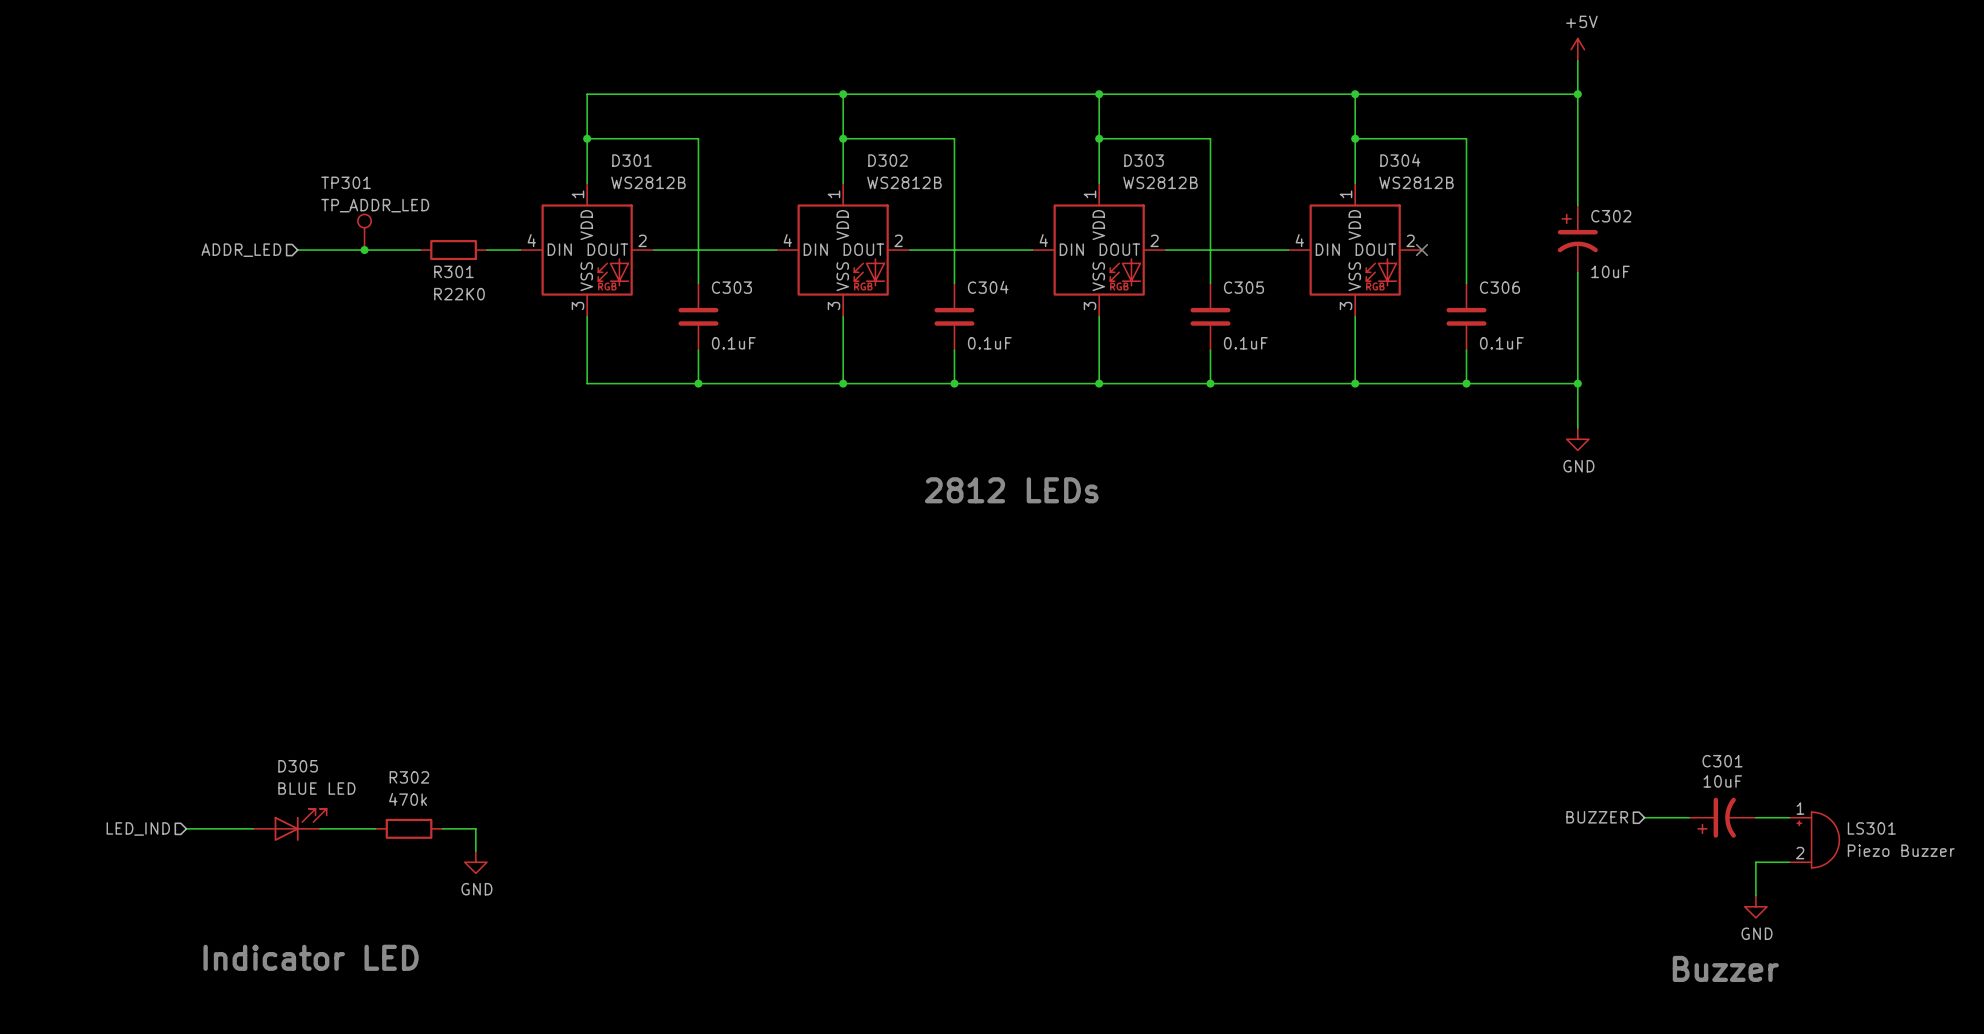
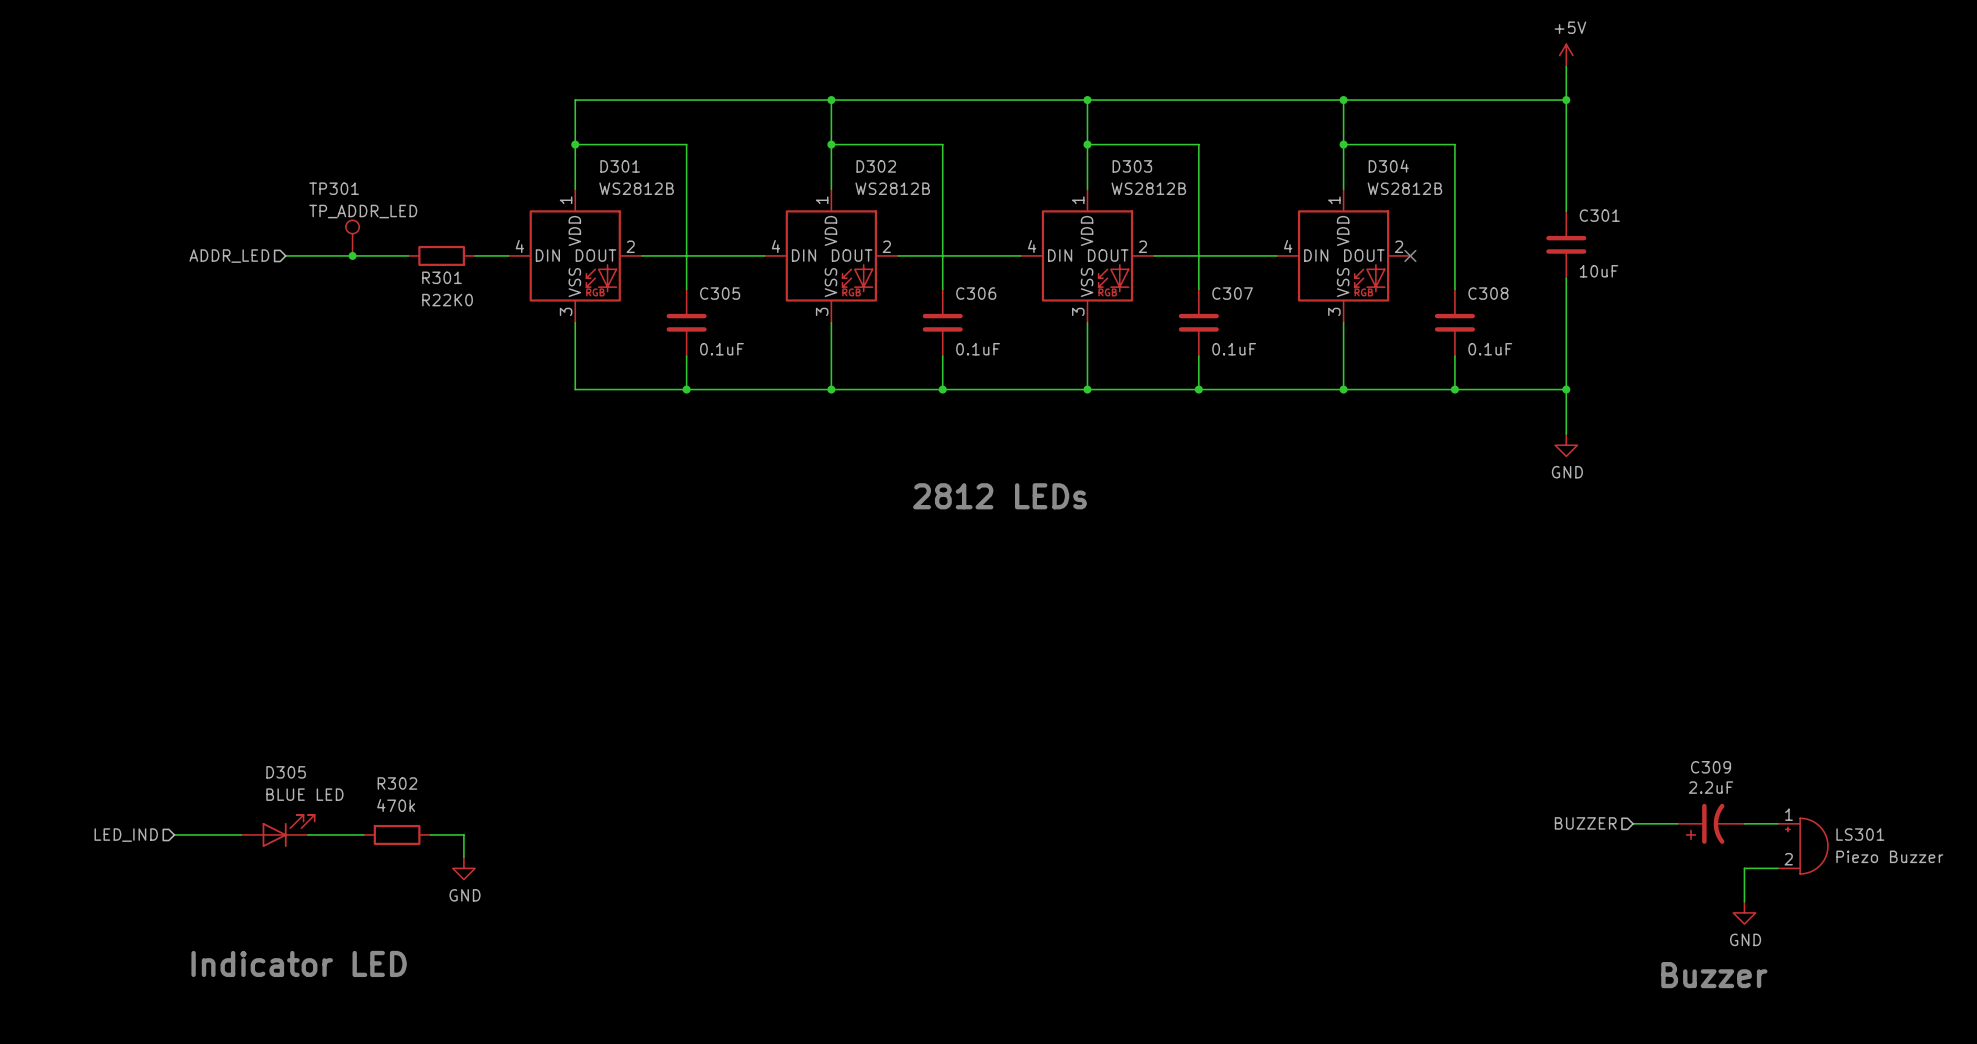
C302: 10uF (1577, 238) -> none
C301: none -> 10uF (1566, 244)
C303 name: C303 (731, 287) -> C305 (720, 293)
C304 name: C304 (988, 287) -> C306 (976, 293)
C305 name: C305 (1243, 287) -> C307 (1232, 293)
C306 name: C306 (1499, 287) -> C308 (1488, 293)
C301 name: C301 (1722, 761) -> C309 (1711, 767)
C301 value: 10uF (1722, 781) -> 2.2uF (1711, 787)

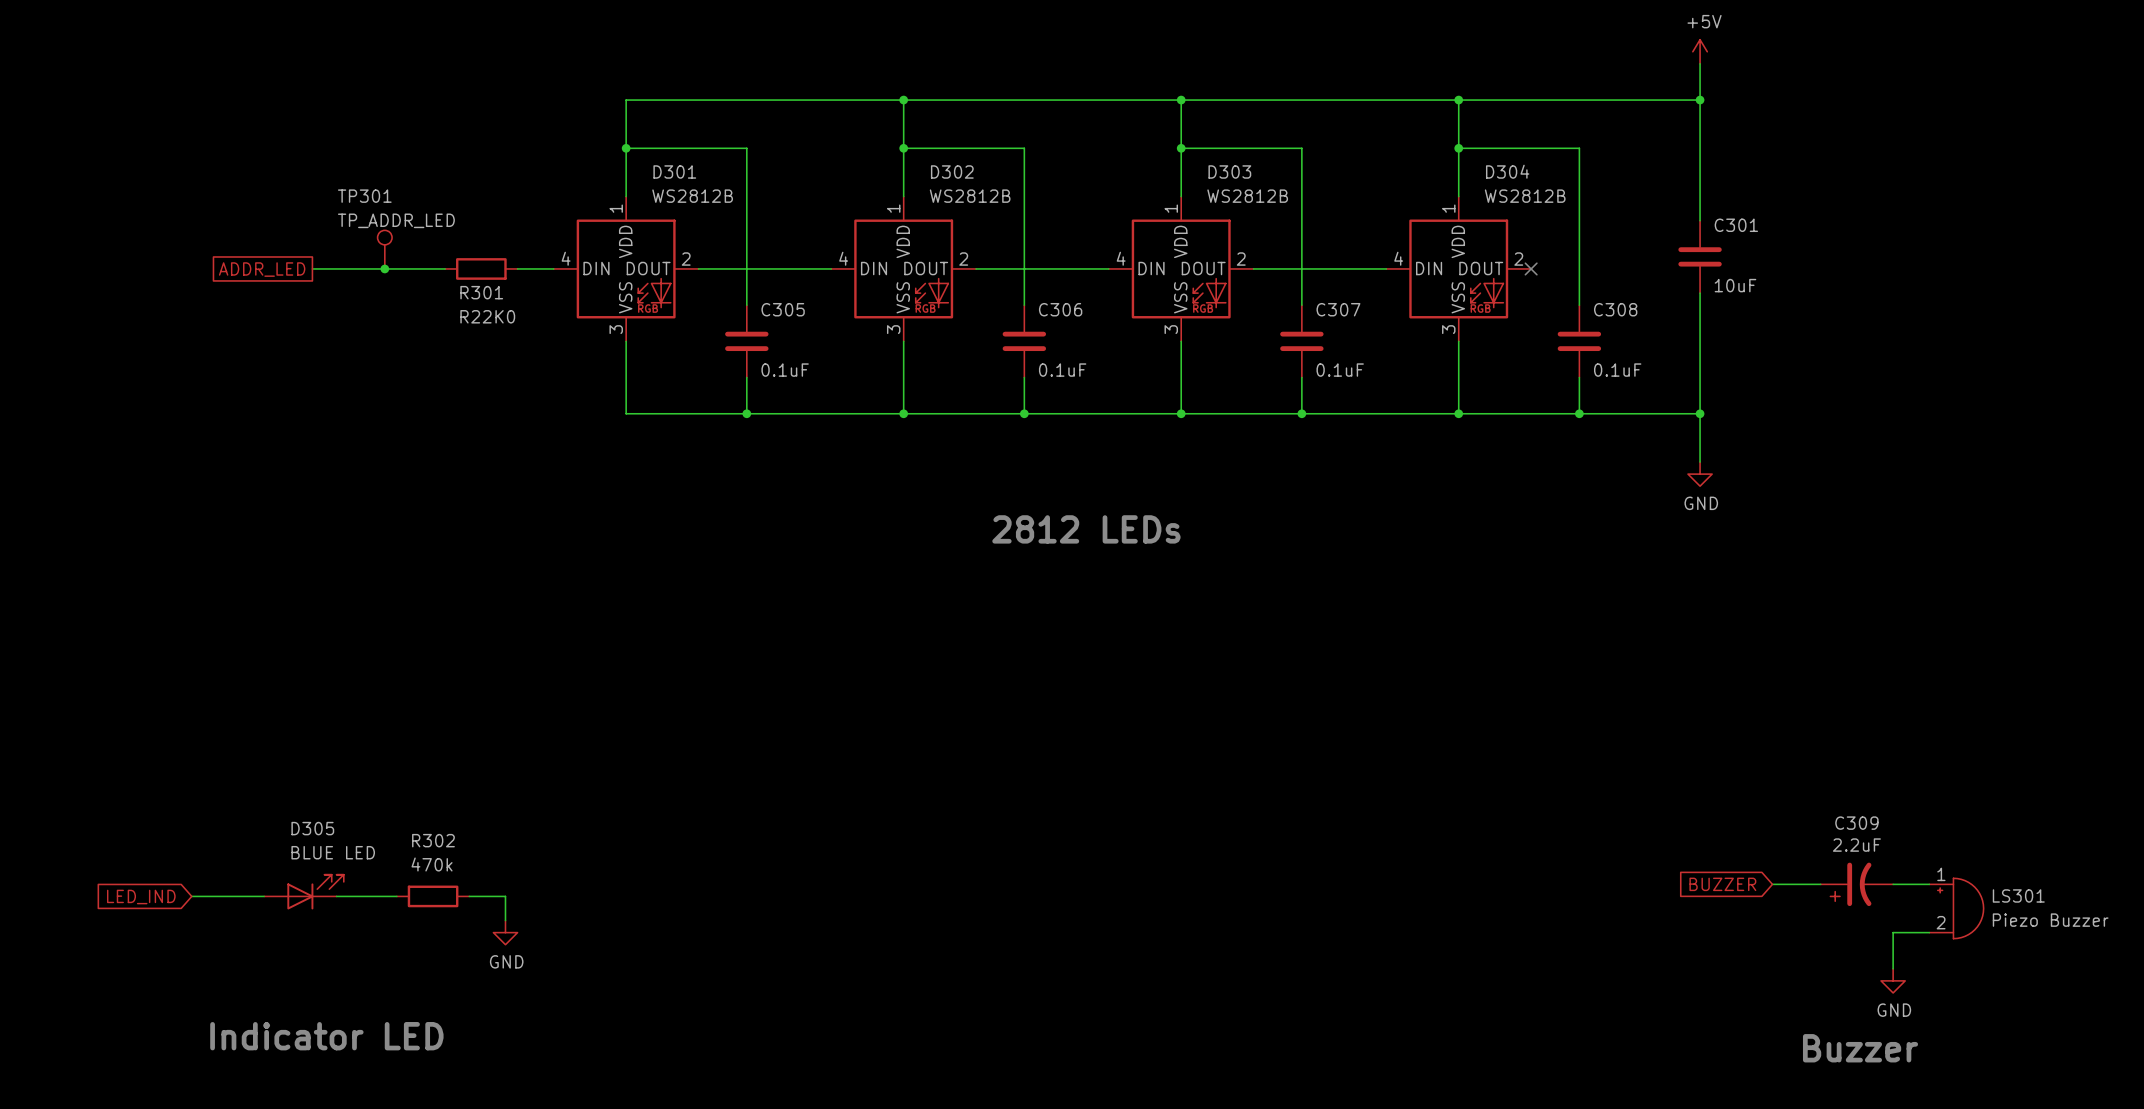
hierarchical label: ADDR_LED (229, 256) -> none
global label: none -> ADDR_LED (262, 269)
hierarchical label: BUZZER (1585, 823) -> none
global label: none -> BUZZER (1722, 884)
hierarchical label: LED_IND (126, 835) -> none
global label: none -> LED_IND (141, 897)

